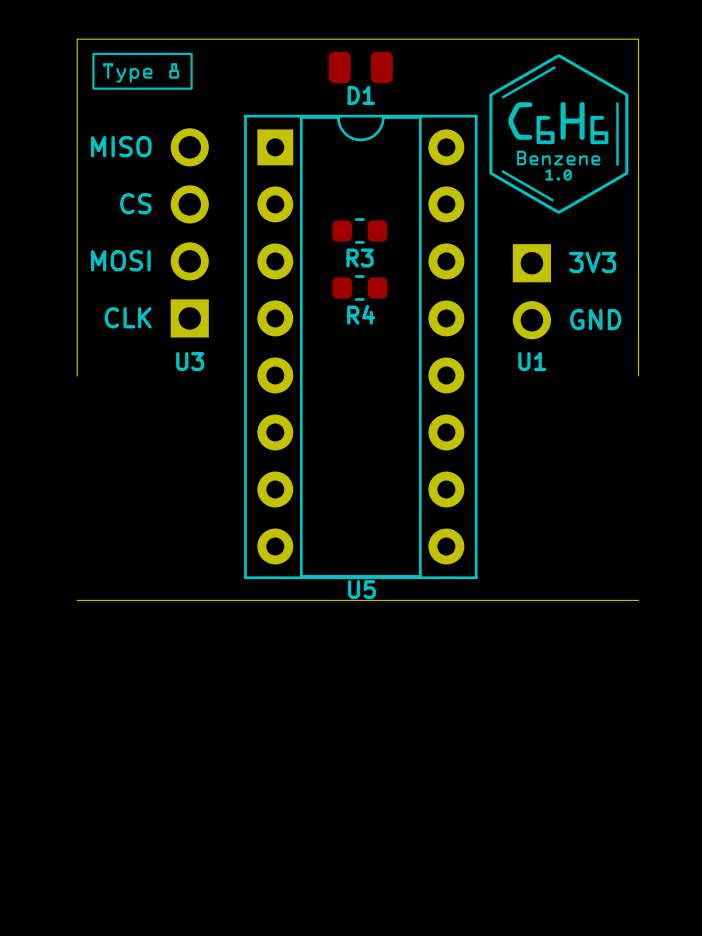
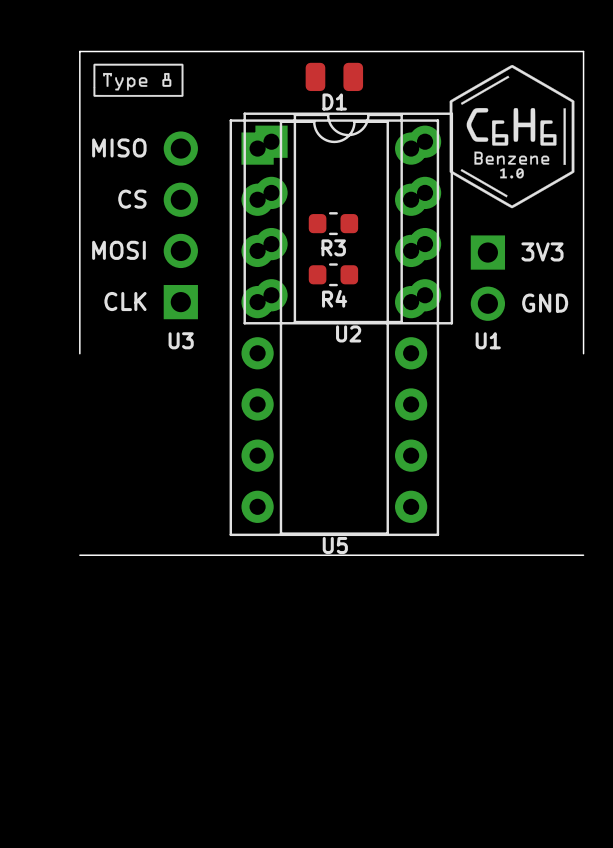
U2: none -> (348, 218)

